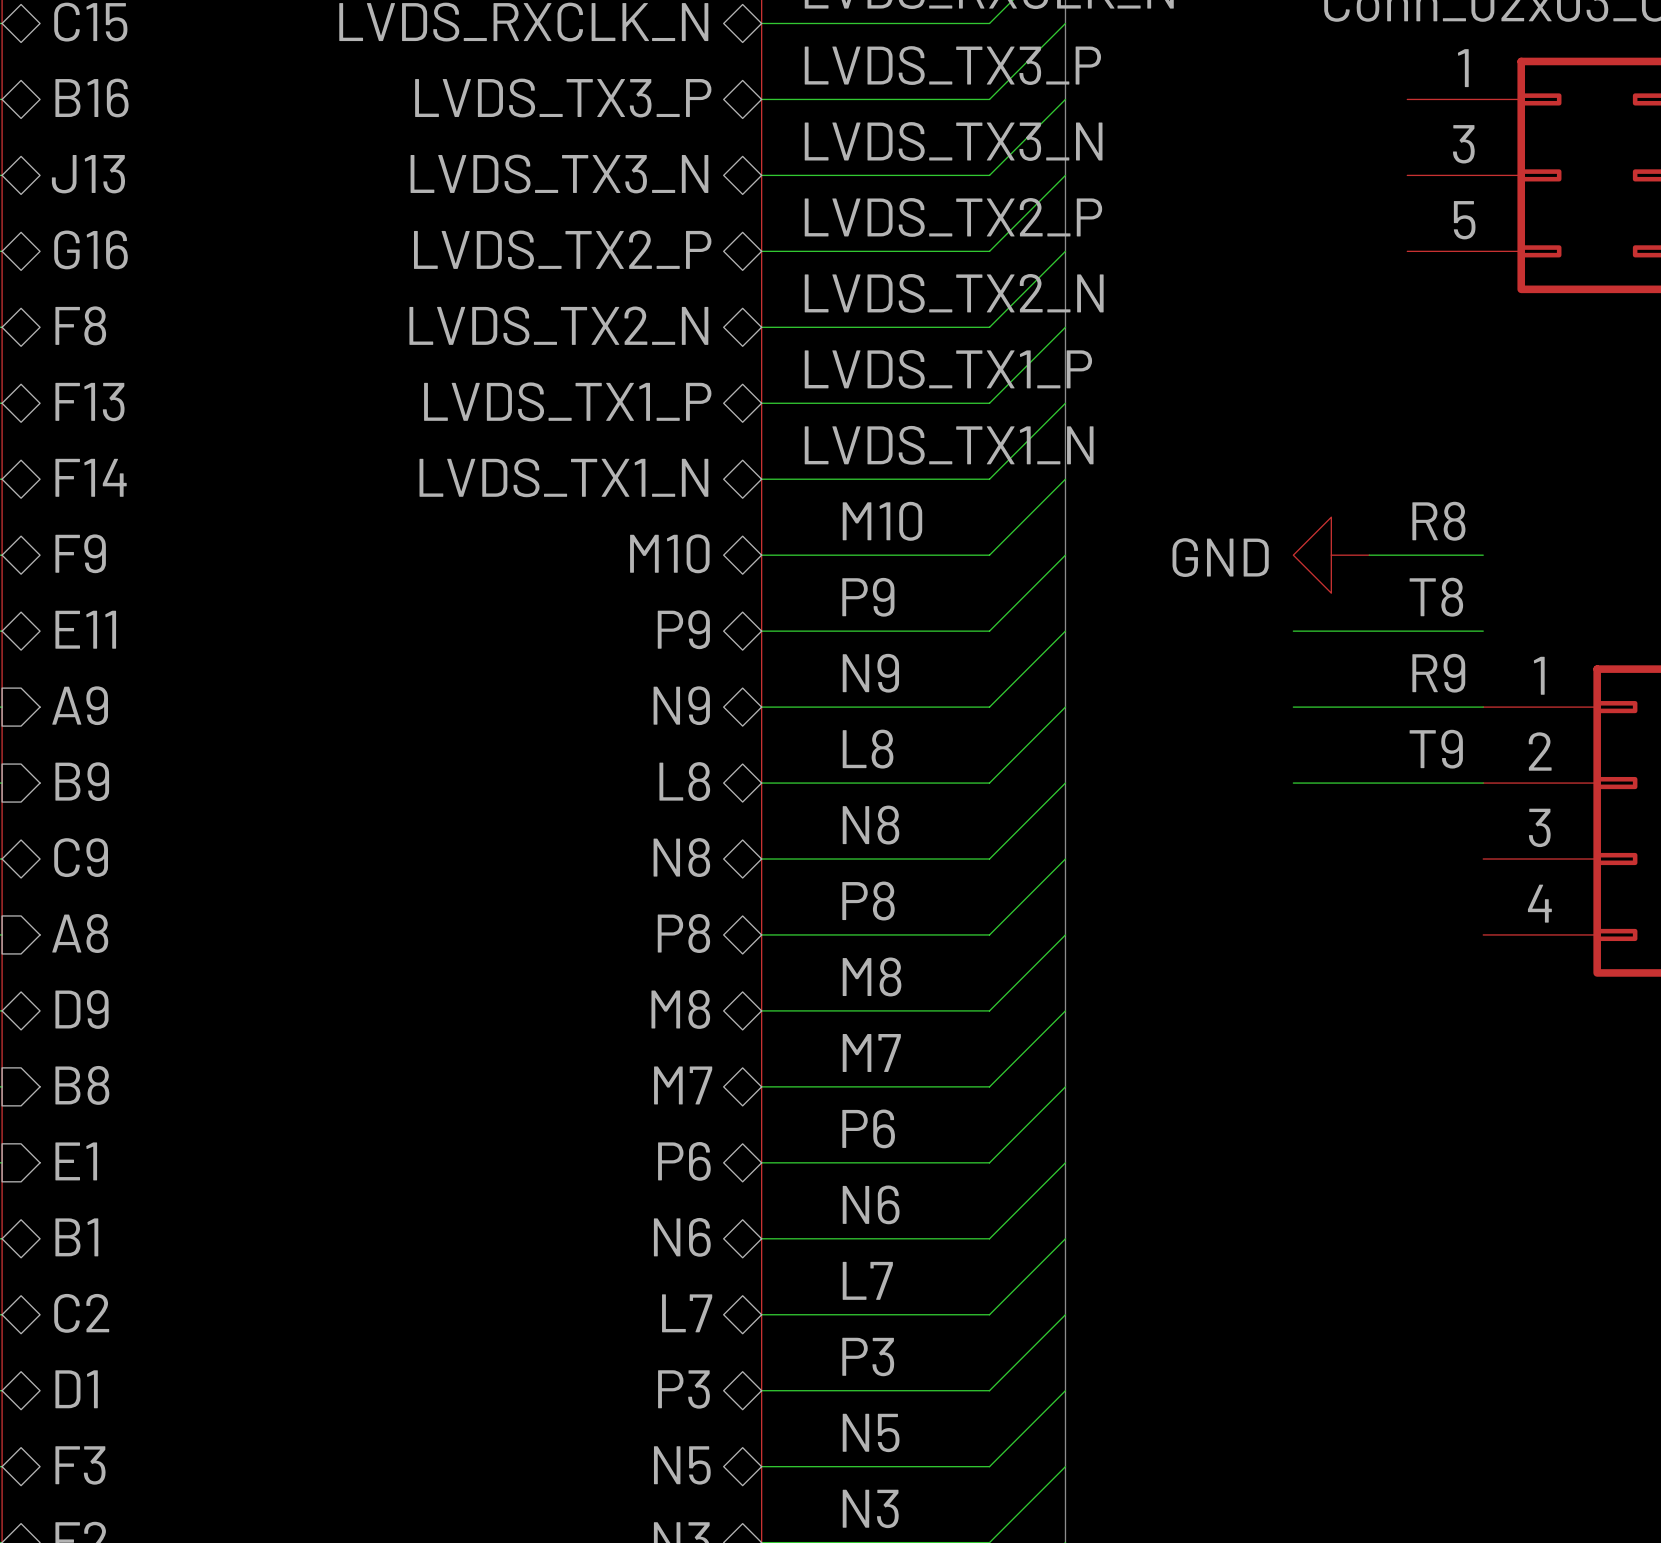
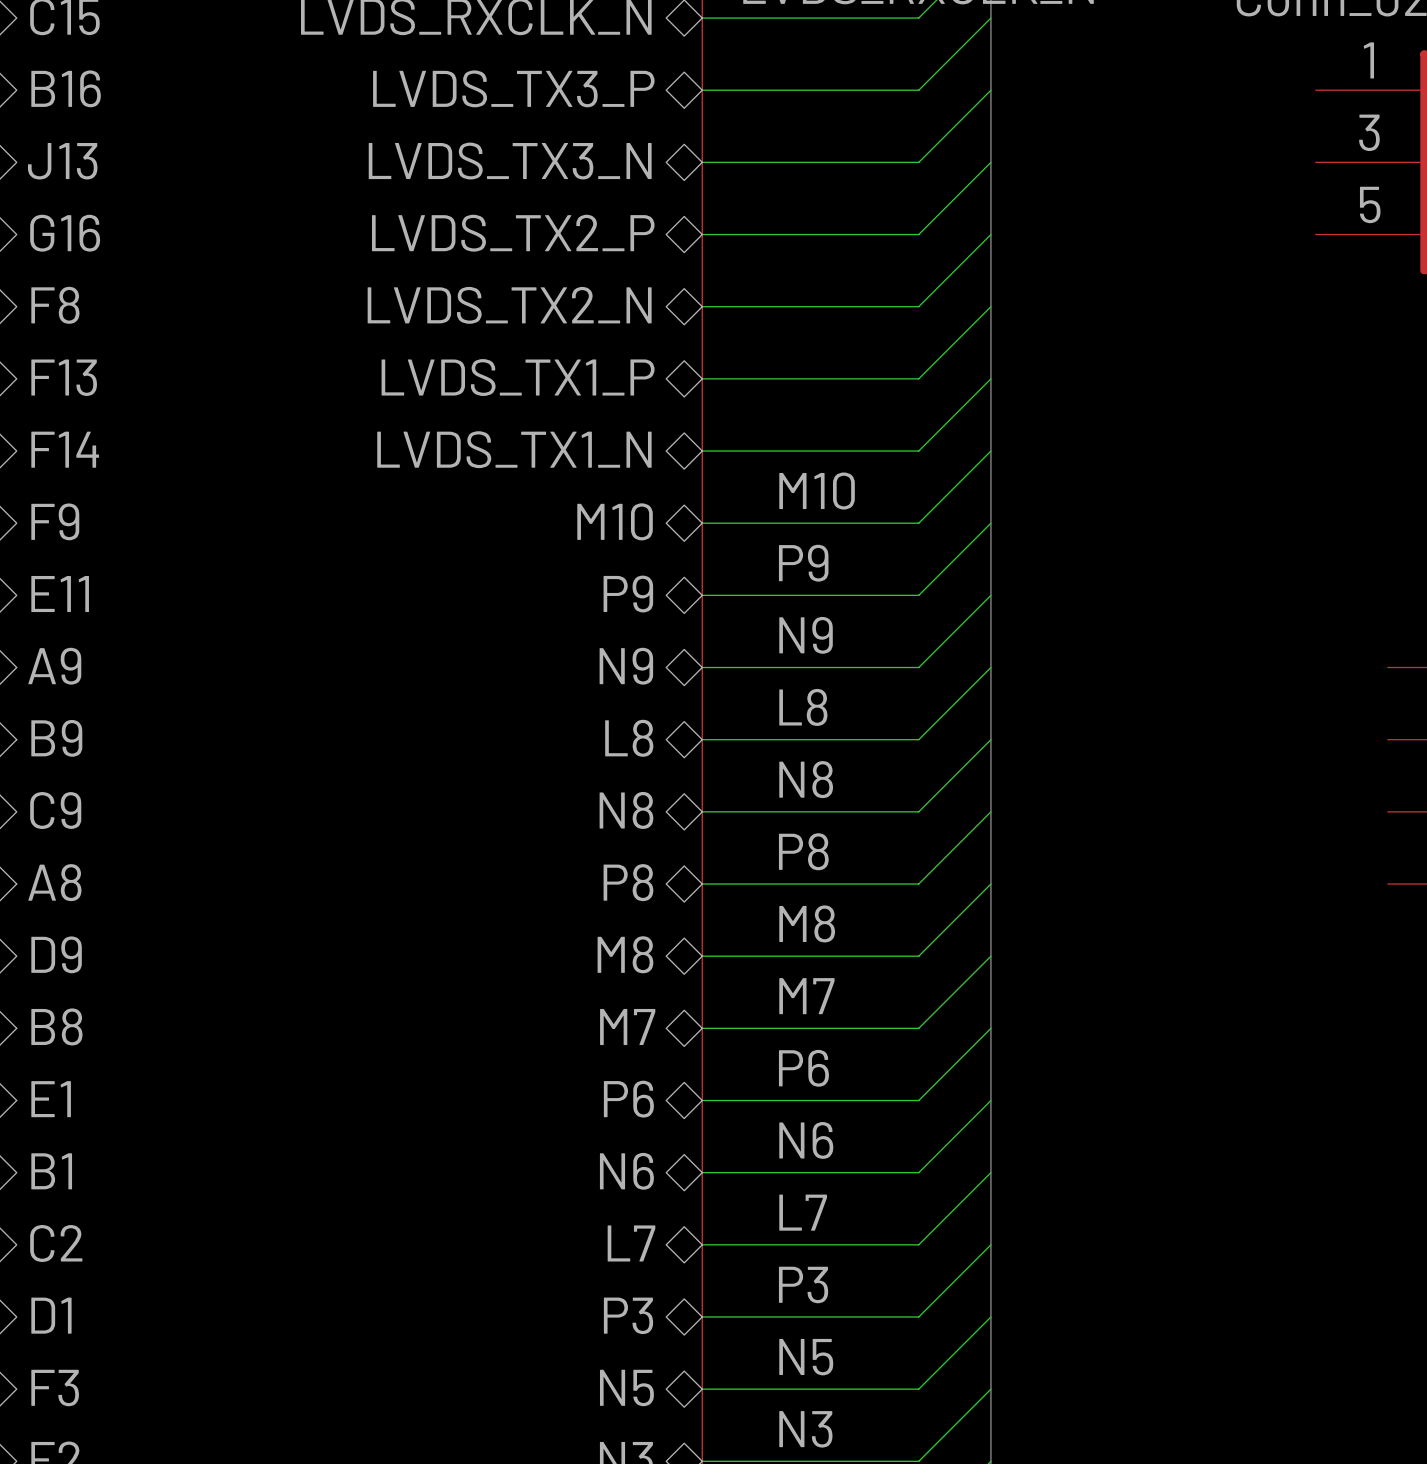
label: LVDS_TX3_P (952, 65) -> none
label: LVDS_TX3_N (953, 141) -> none
label: LVDS_TX2_P (953, 217) -> none
label: LVDS_TX2_N (954, 293) -> none
label: LVDS_TX1_P (948, 369) -> none
label: LVDS_TX1_N (949, 445) -> none
label: R8 (1438, 521) -> none
power symbol: GND (1331, 555) -> none
wire: (1369, 555) (1483, 555) -> none
label: T8 (1436, 597) -> none
wire: (1293, 631) (1483, 631) -> none
label: R9 (1438, 673) -> none
wire: (1293, 707) (1483, 707) -> none
label: T9 (1436, 749) -> none
wire: (1293, 783) (1483, 783) -> none

